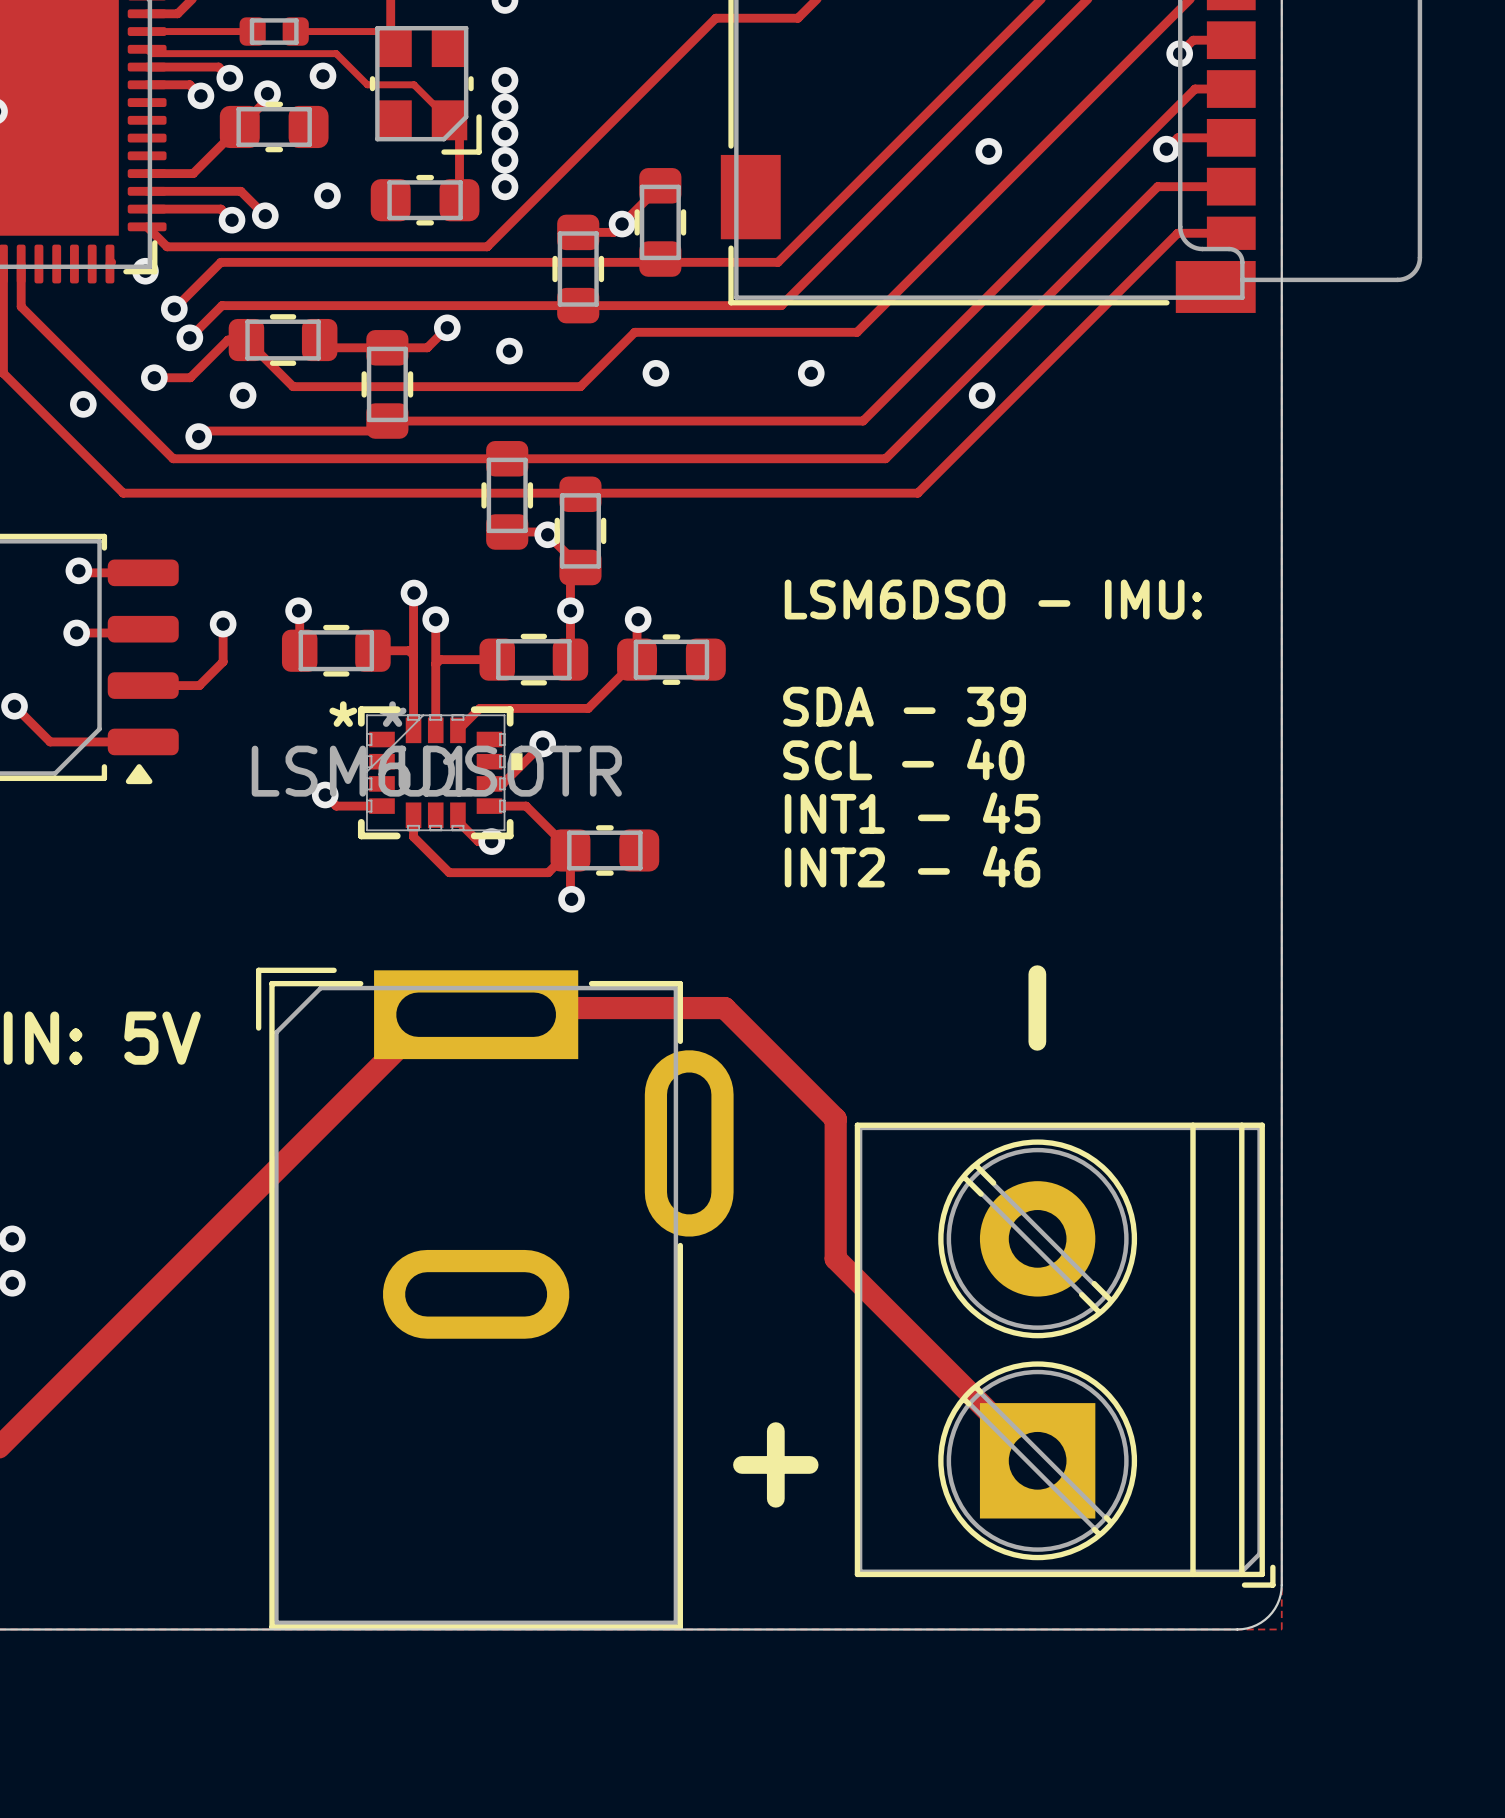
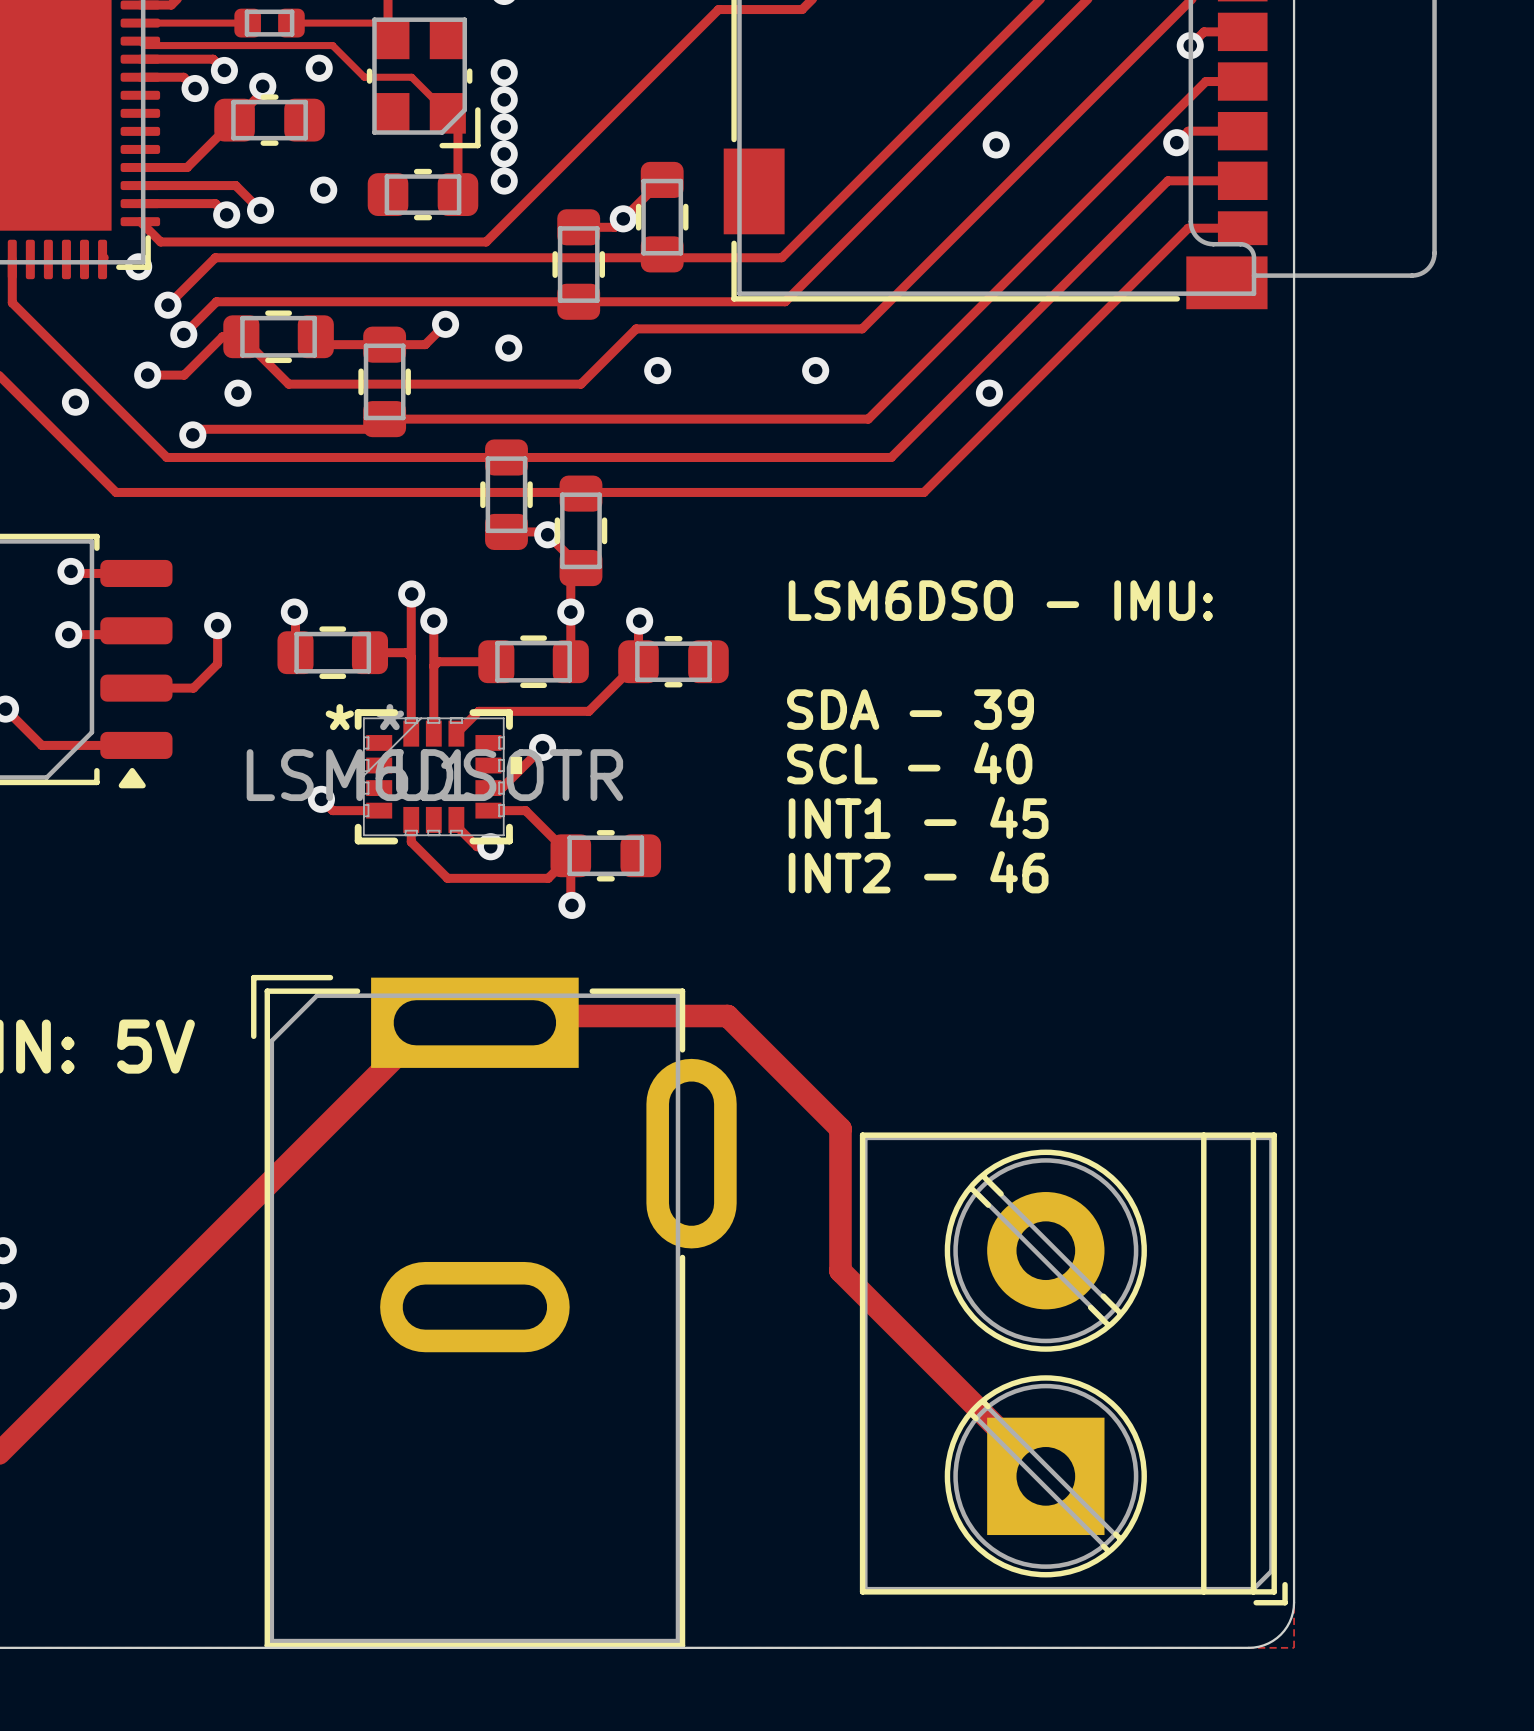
text: - (1037, 1008) -> none
text: + (775, 1464) -> none

